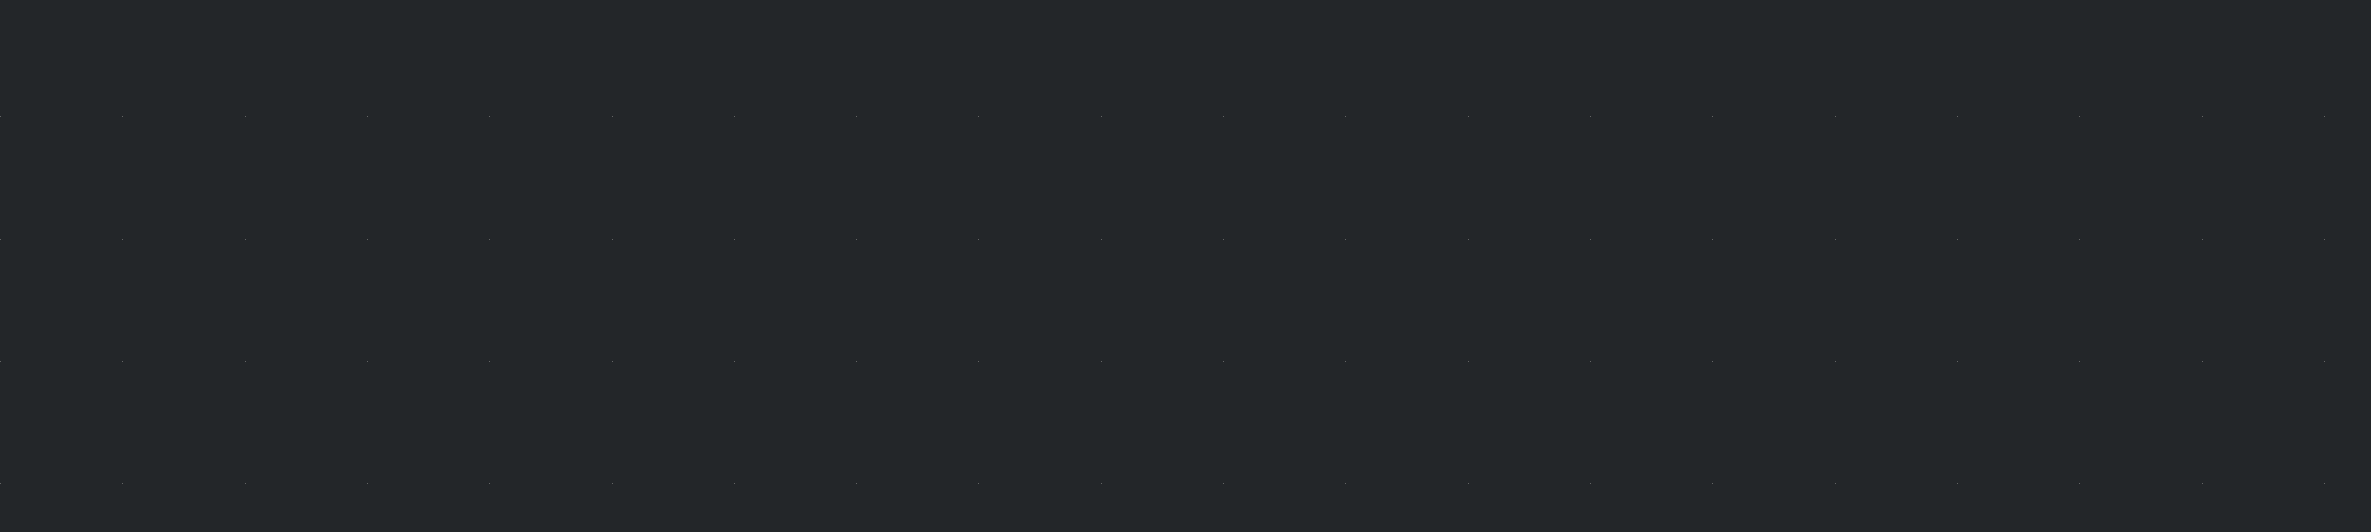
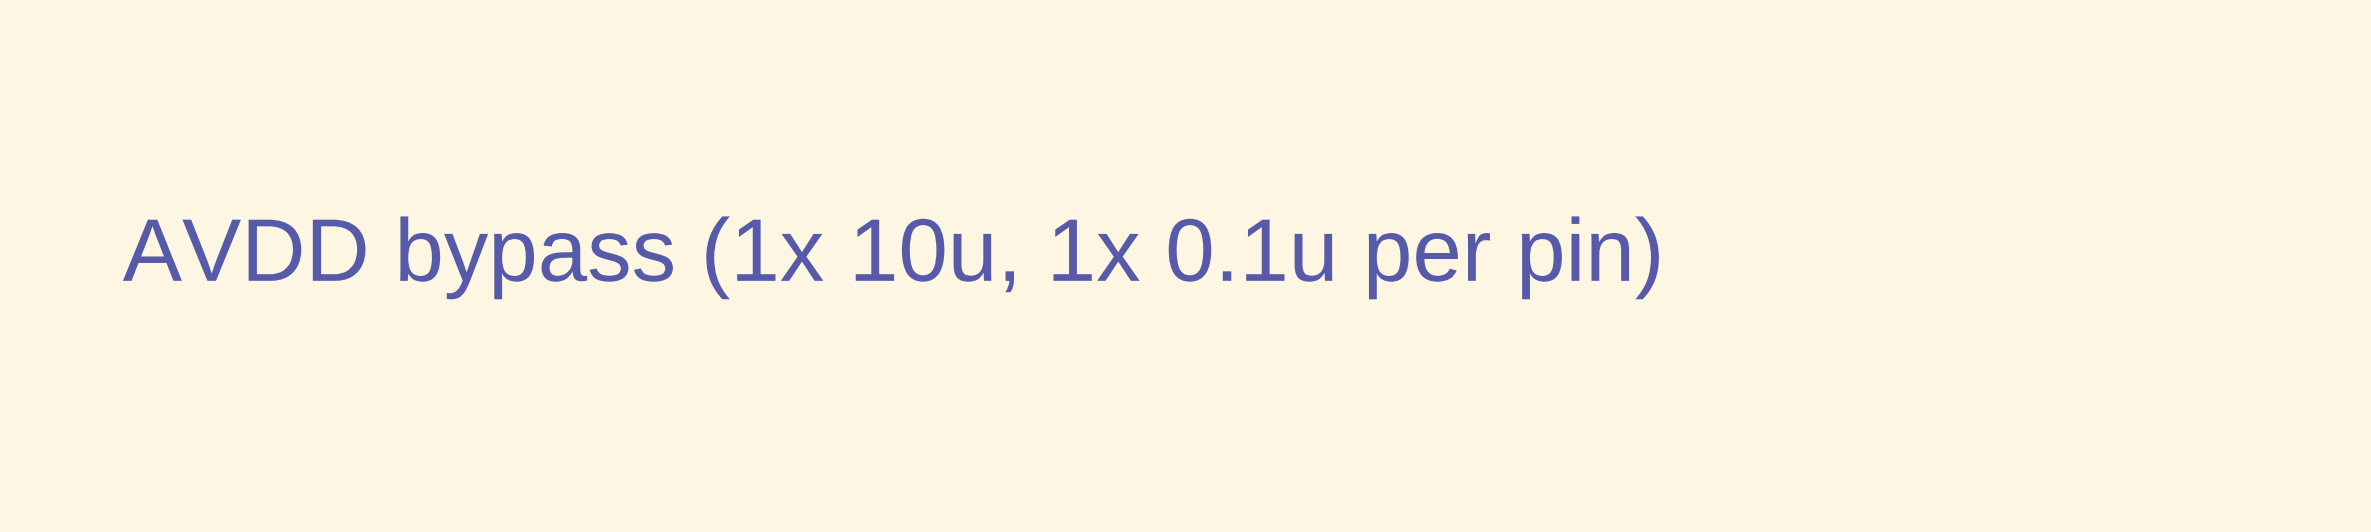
text: none -> AVDD bypass (1x 10u, 1x 0.1u per pin) (890, 257)

